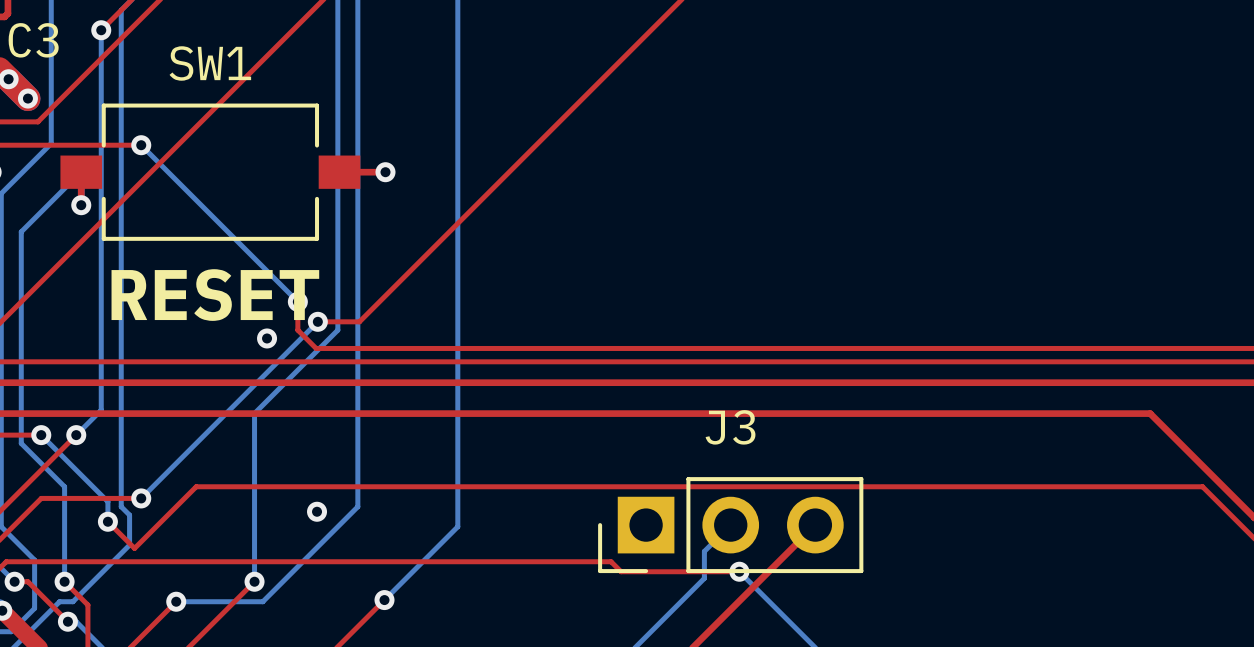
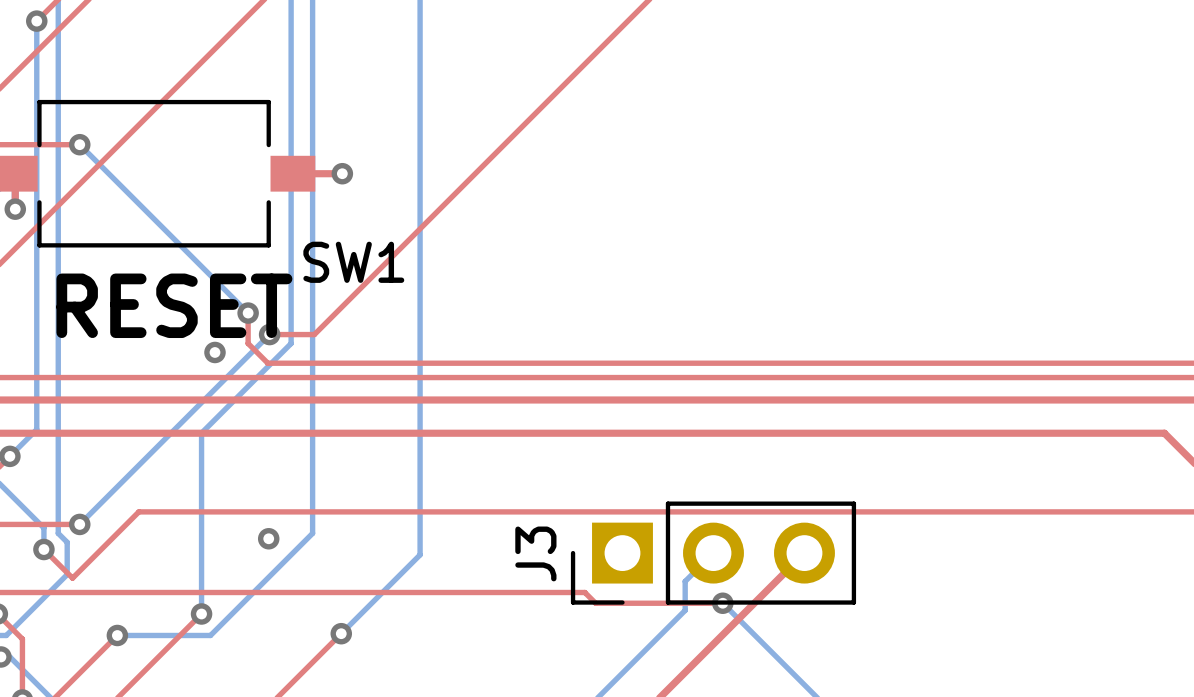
SW1 name position: SW1 (210, 63) -> SW1 (353, 262)
J3 name rotation: 0° (730, 427) -> 90° counterclockwise (535, 553)
J3 name position: J3 (730, 427) -> J3 (535, 553)

